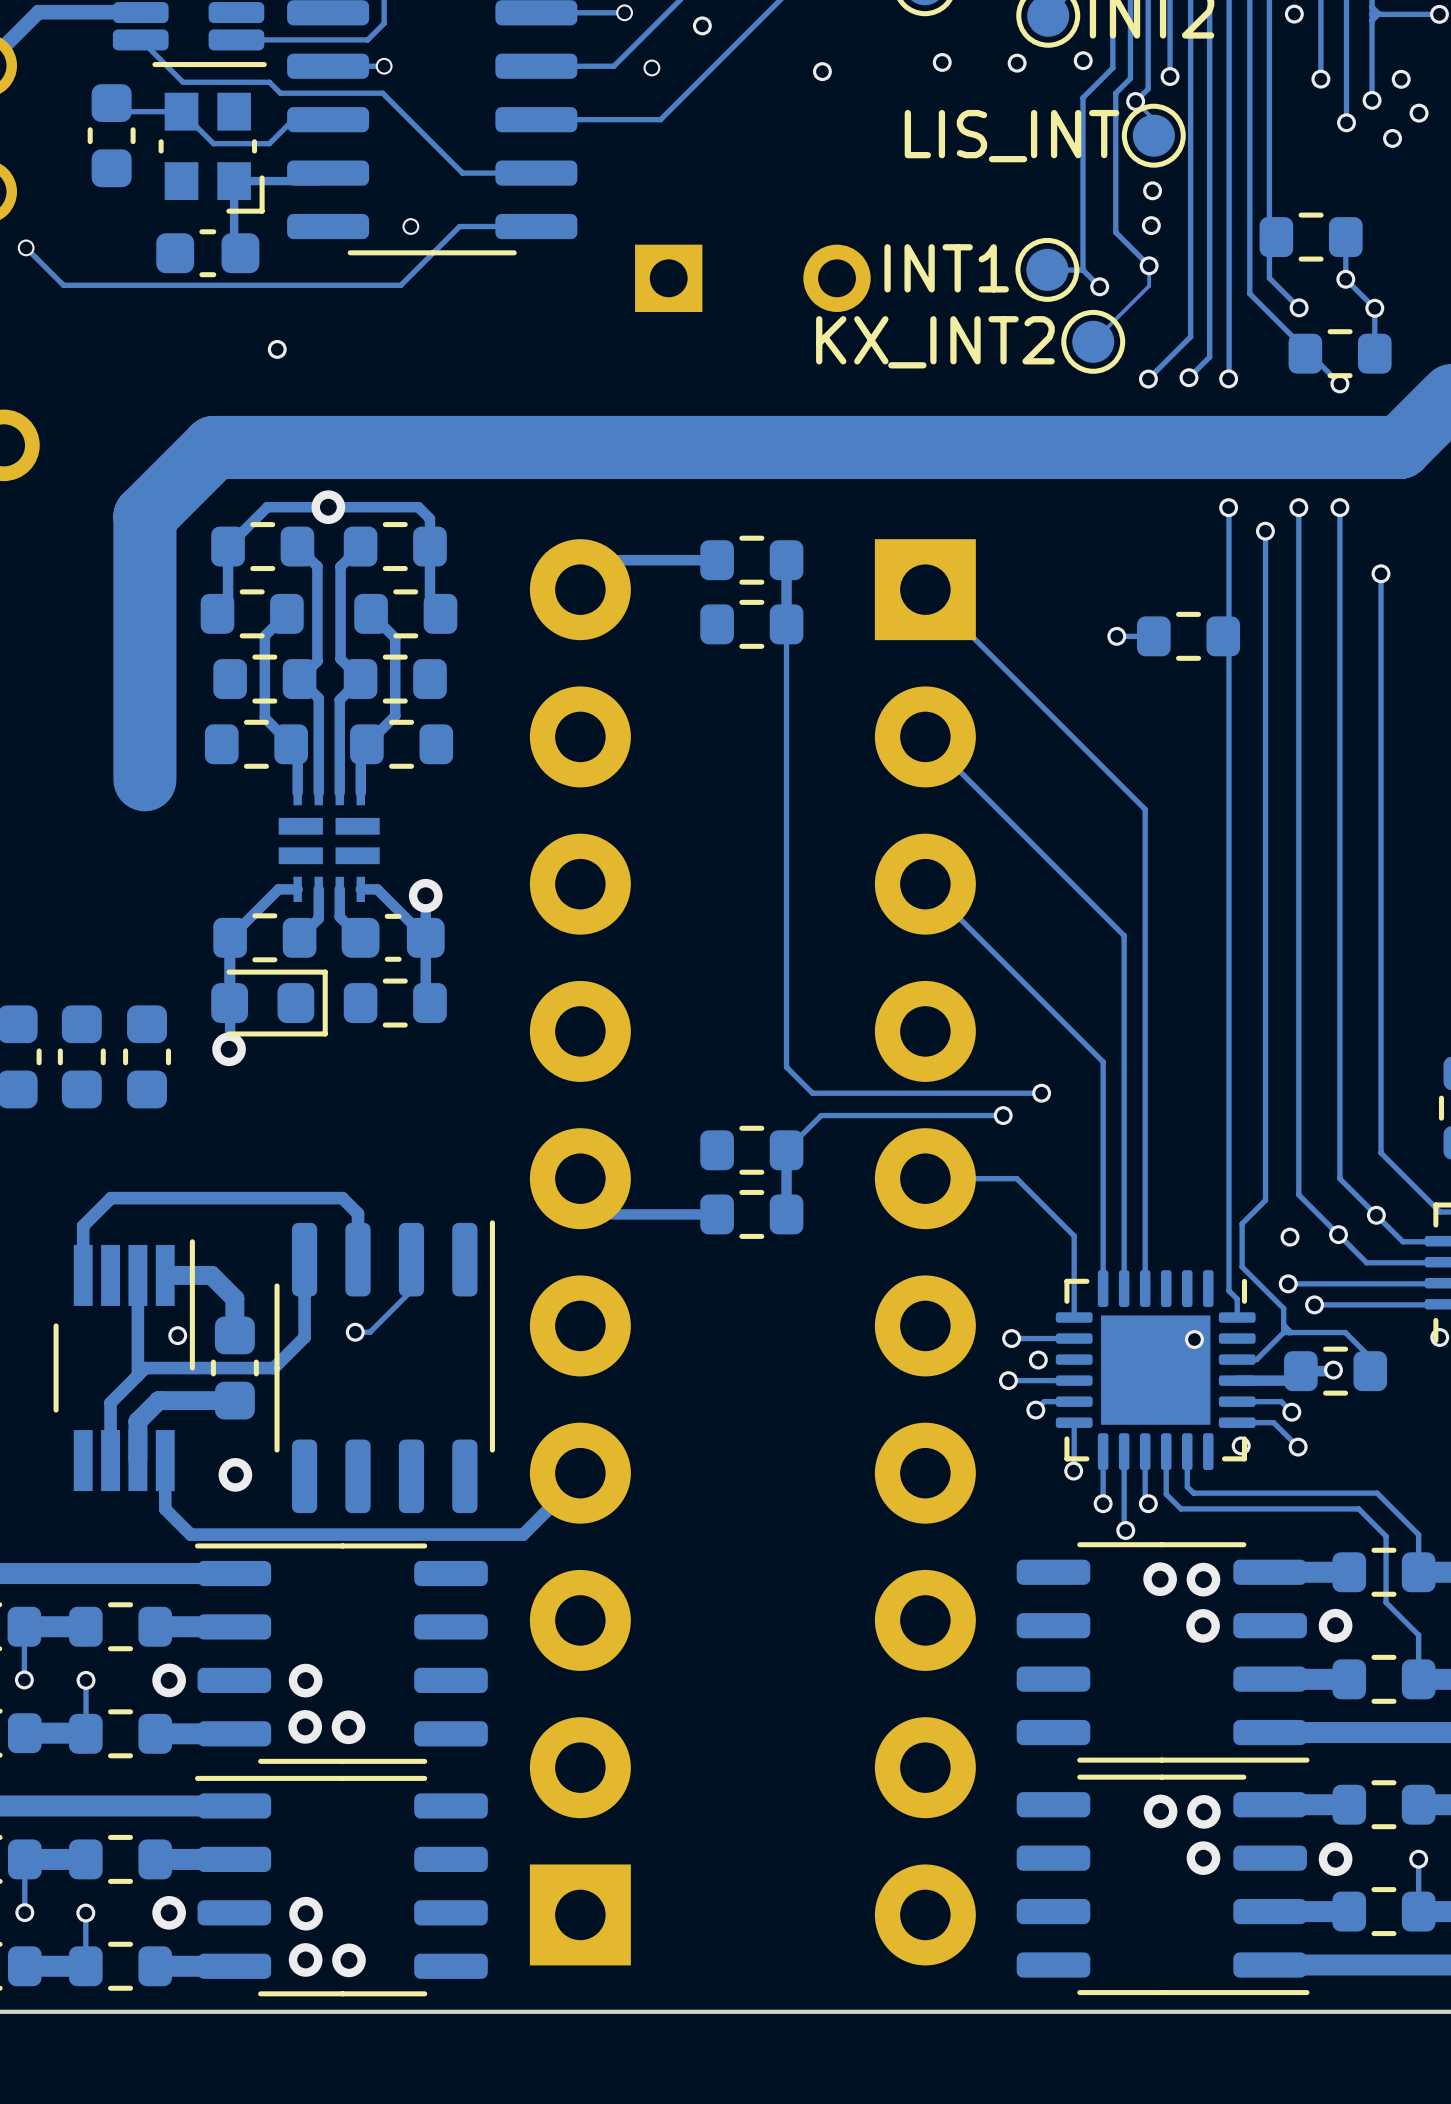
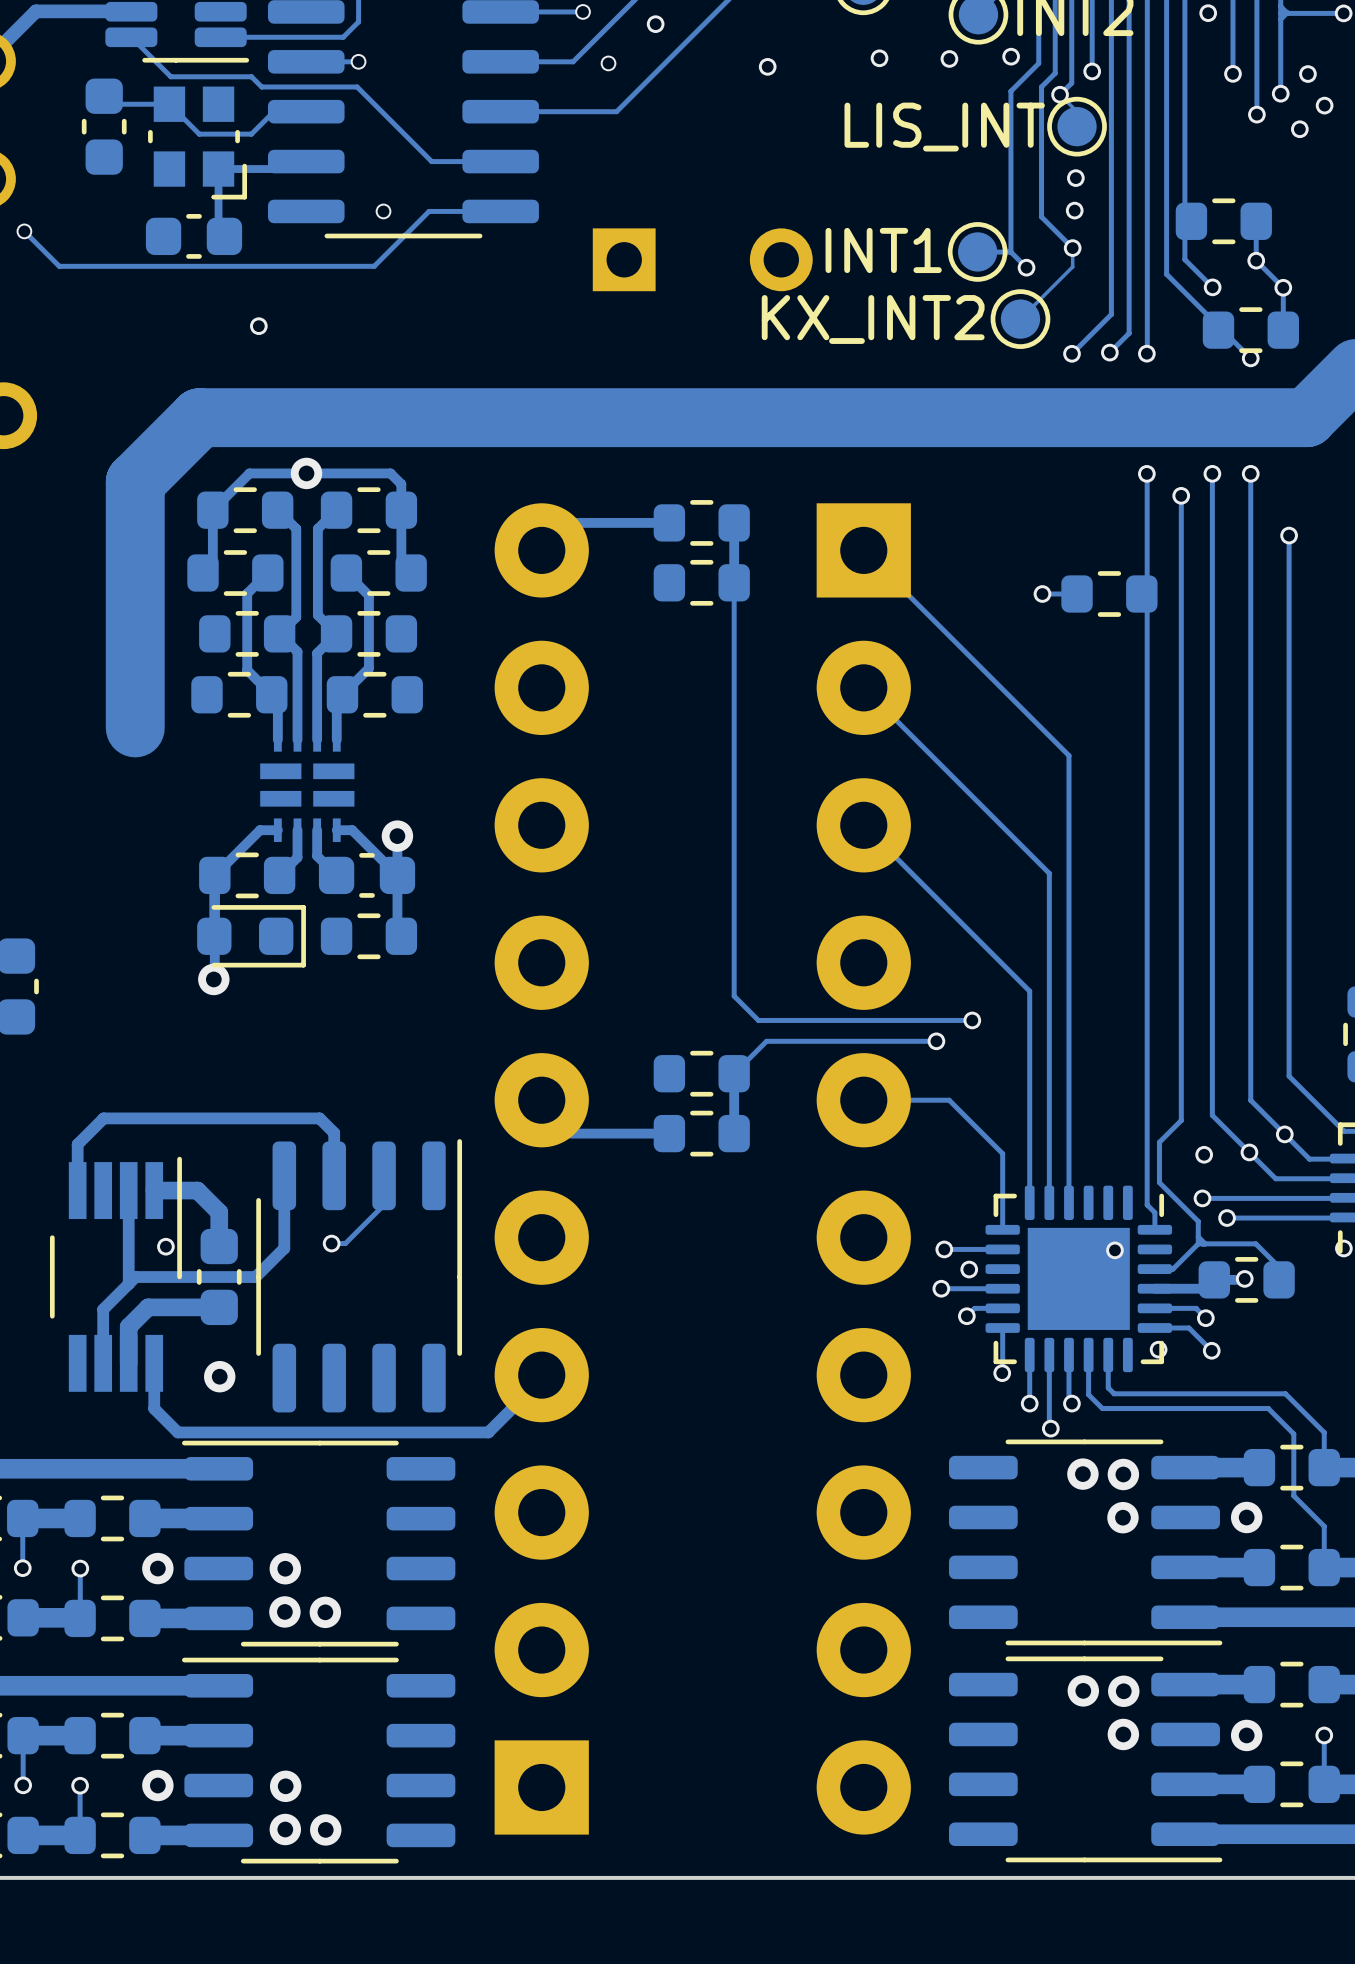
part: (81, 1056) -> none
part: (147, 1056) -> none

